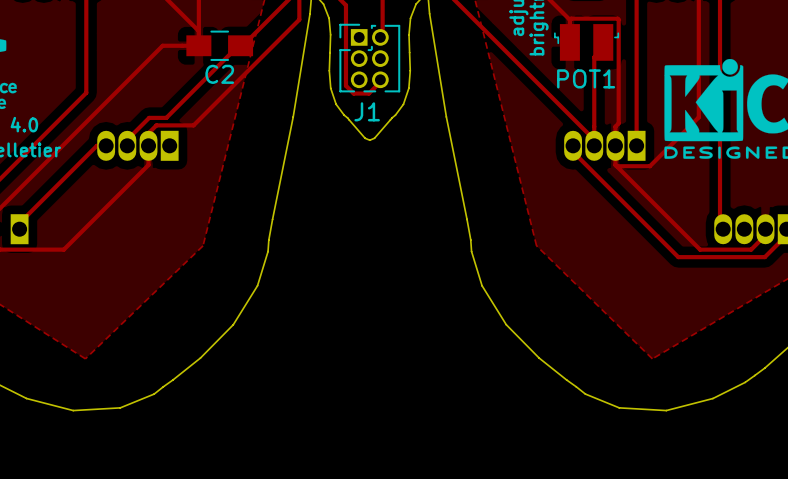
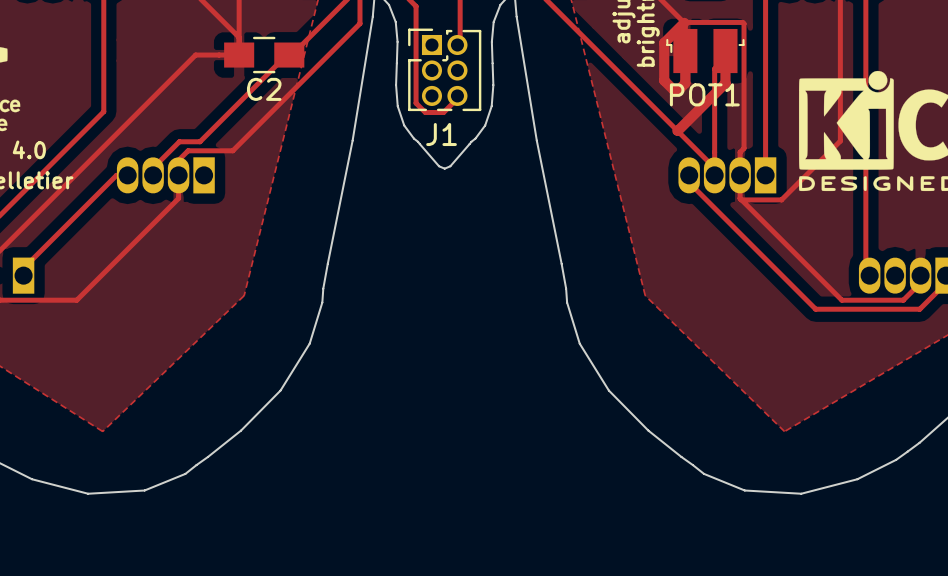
track: none -> (684, 22) (664, 42) (664, 80) (674, 90) (678, 90) (685, 83) (685, 51)
track: none -> (725, 51) (725, 83) (677, 130)

